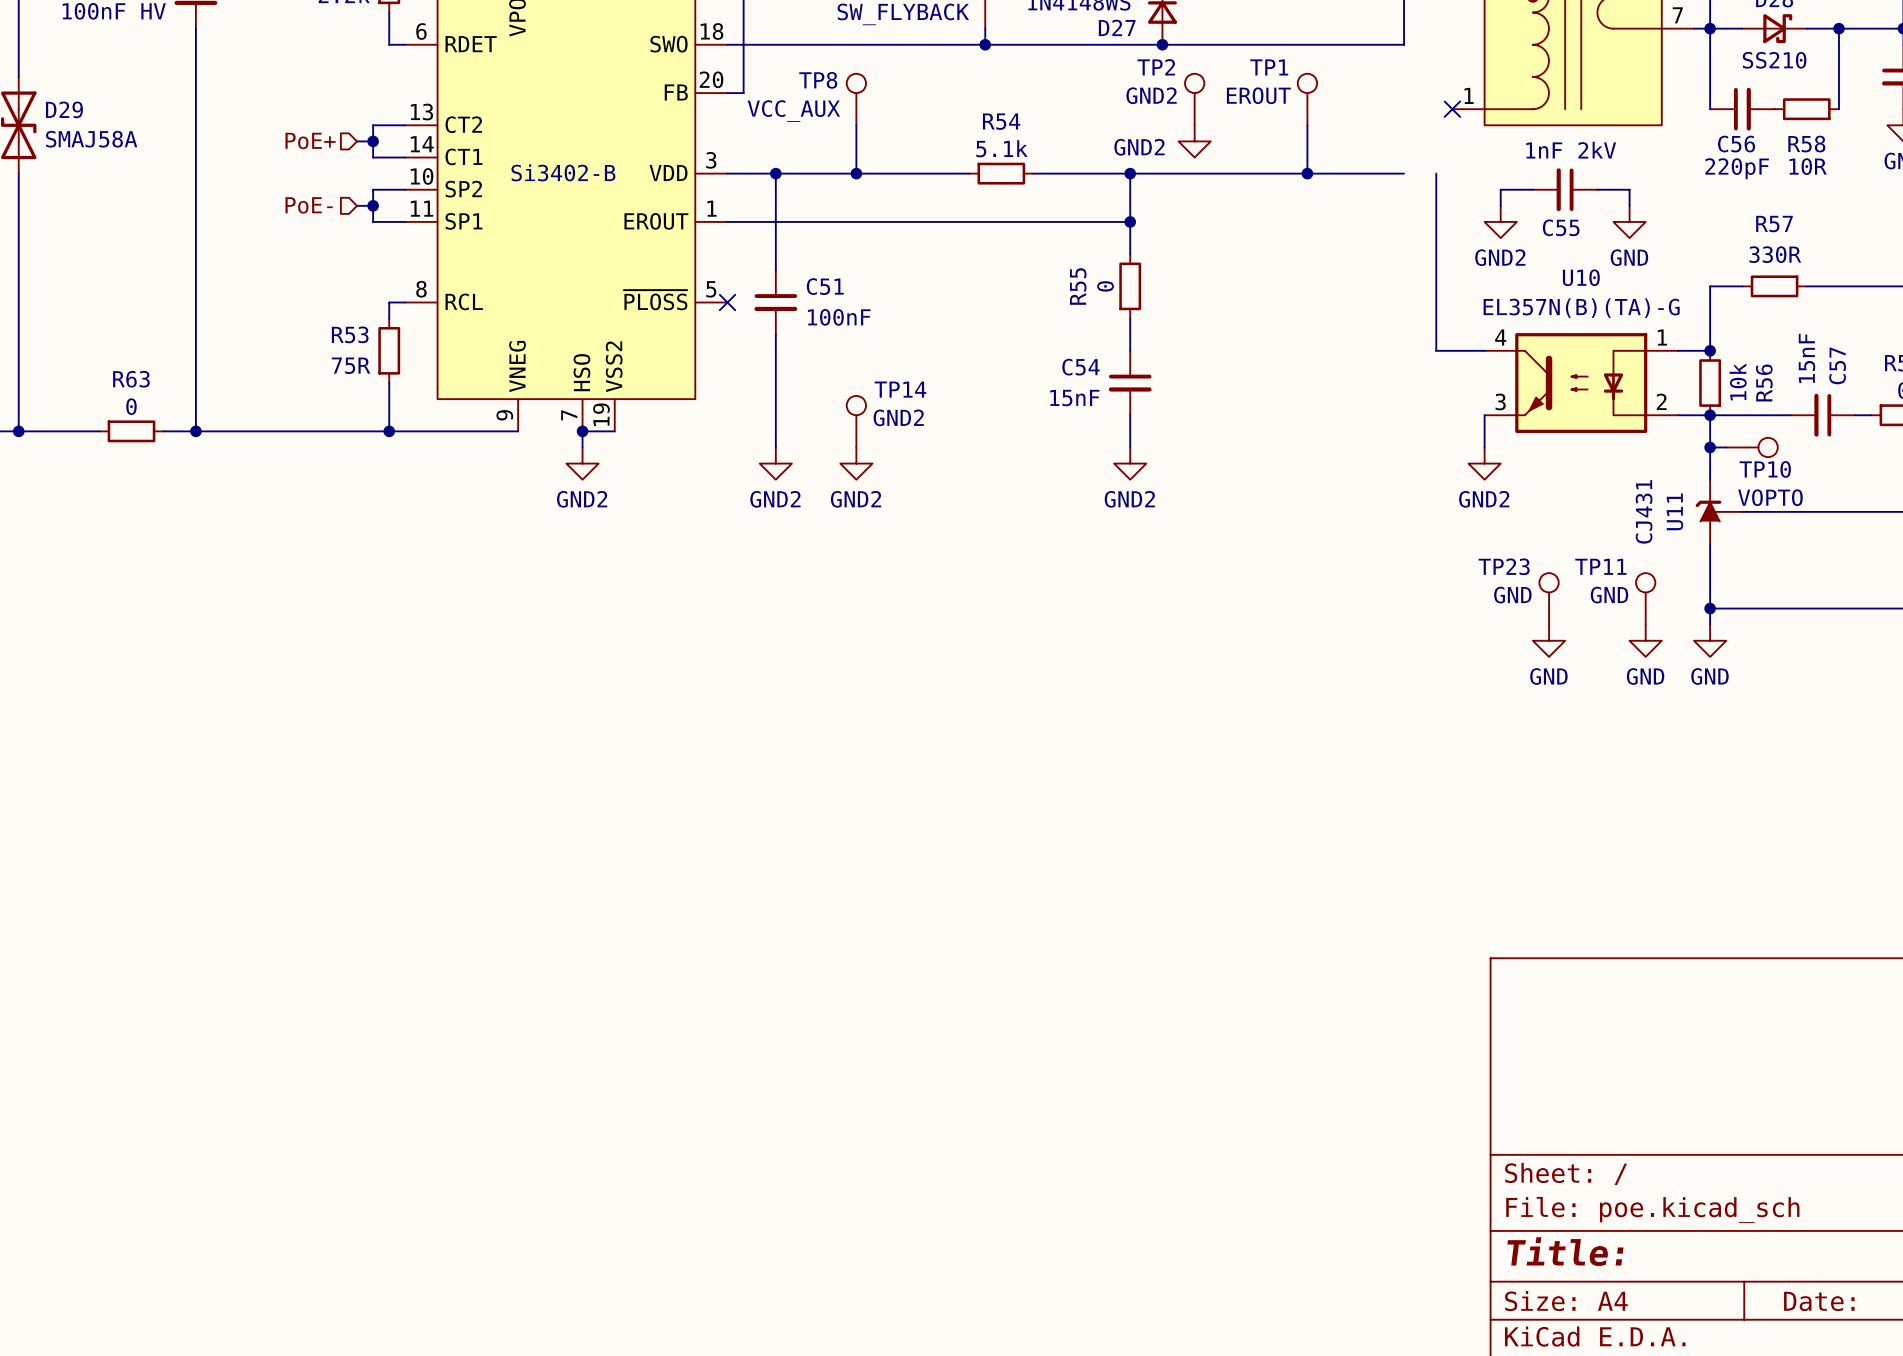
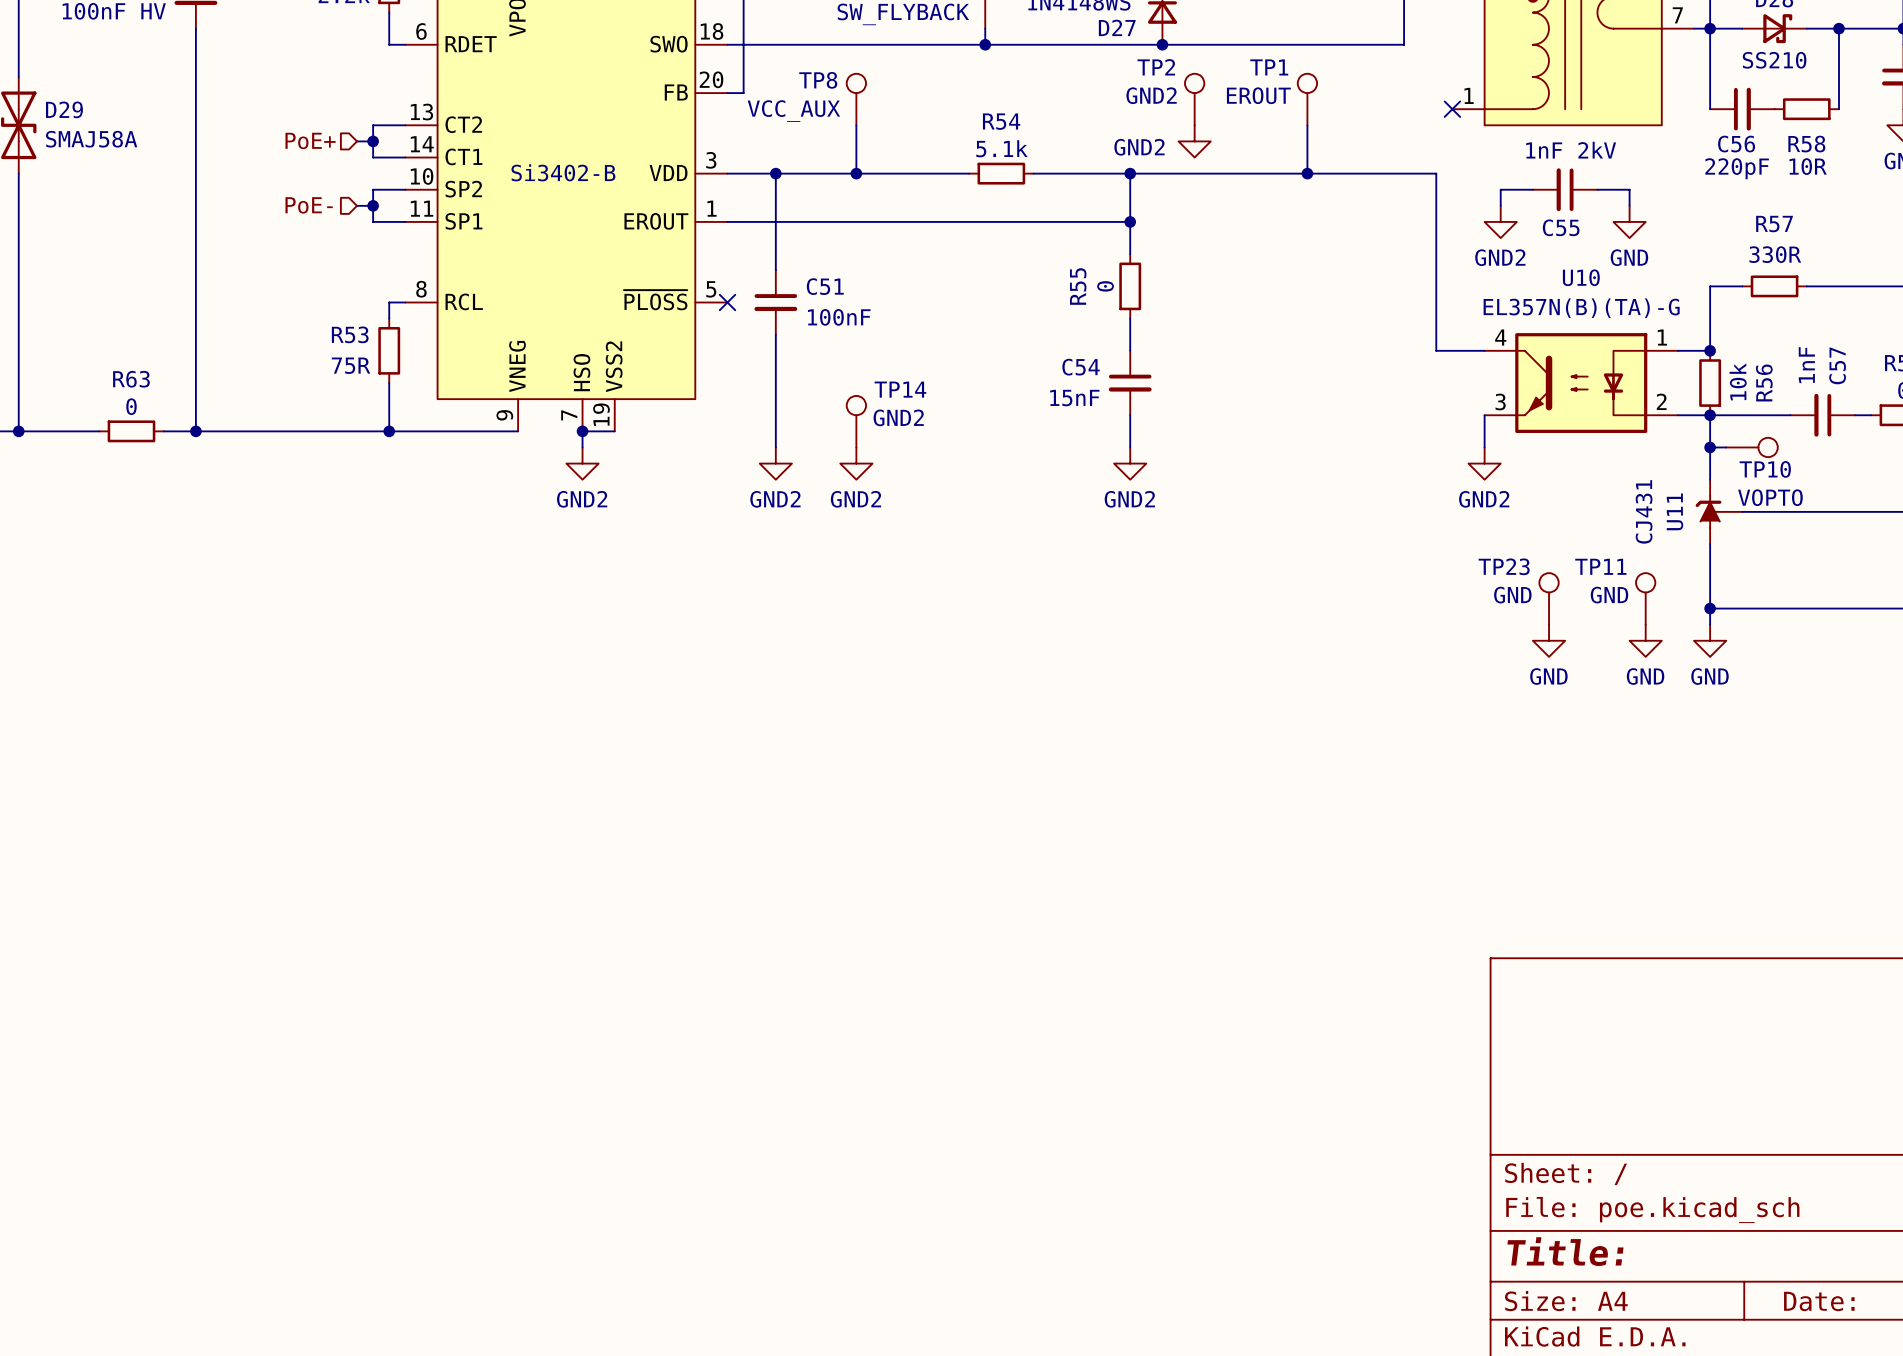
wire: none -> (1404, 173) (1436, 173)
C57 value: 15nF (1806, 358) -> 1nF (1806, 365)

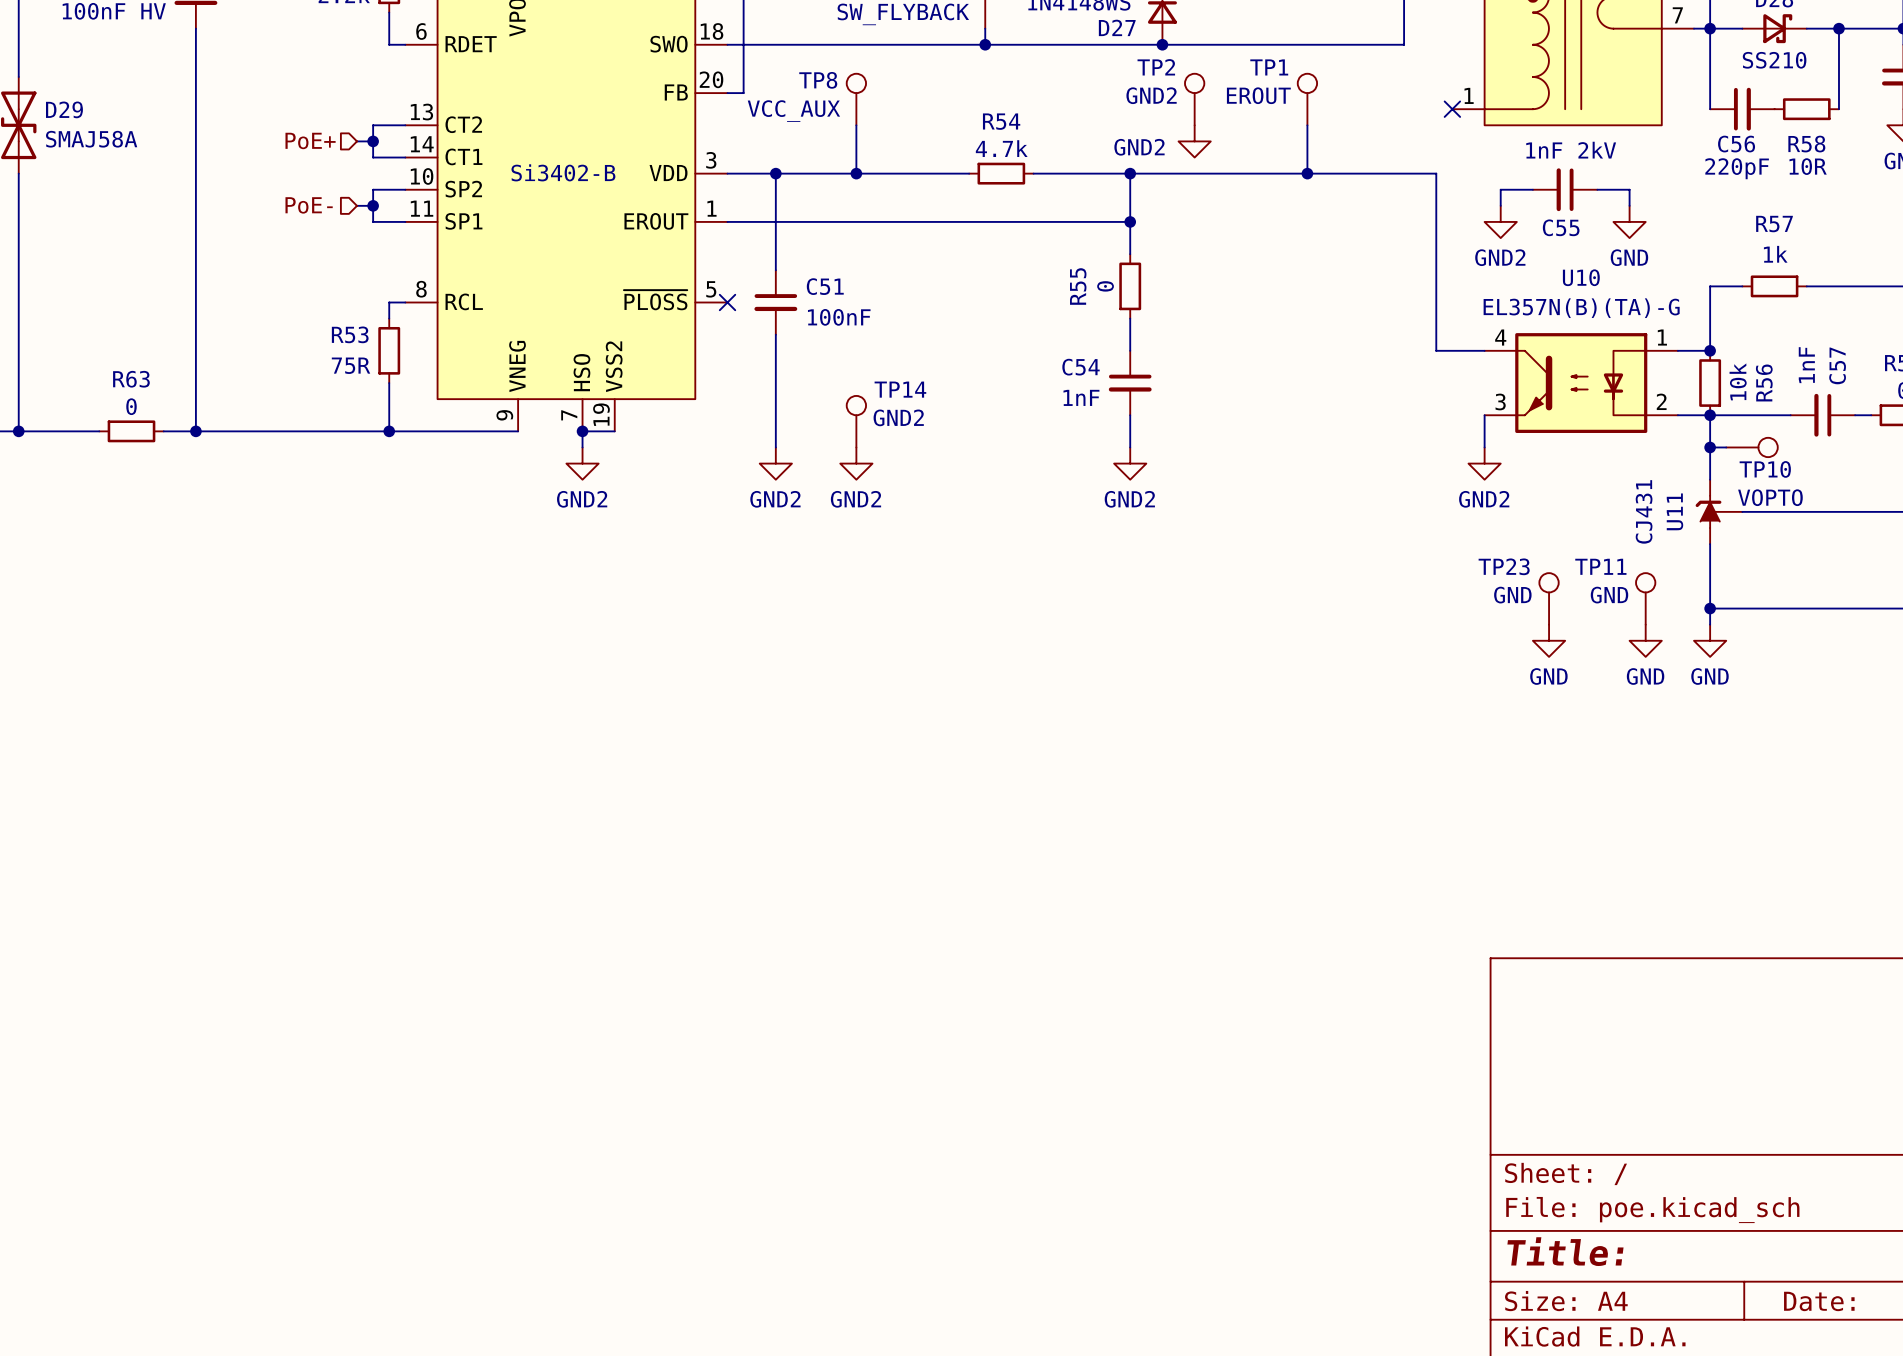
R54 value: 5.1k (1001, 148) -> 4.7k (1001, 148)
R57 value: 330R (1775, 254) -> 1k (1775, 254)
C54 value: 15nF (1074, 398) -> 1nF (1081, 397)

